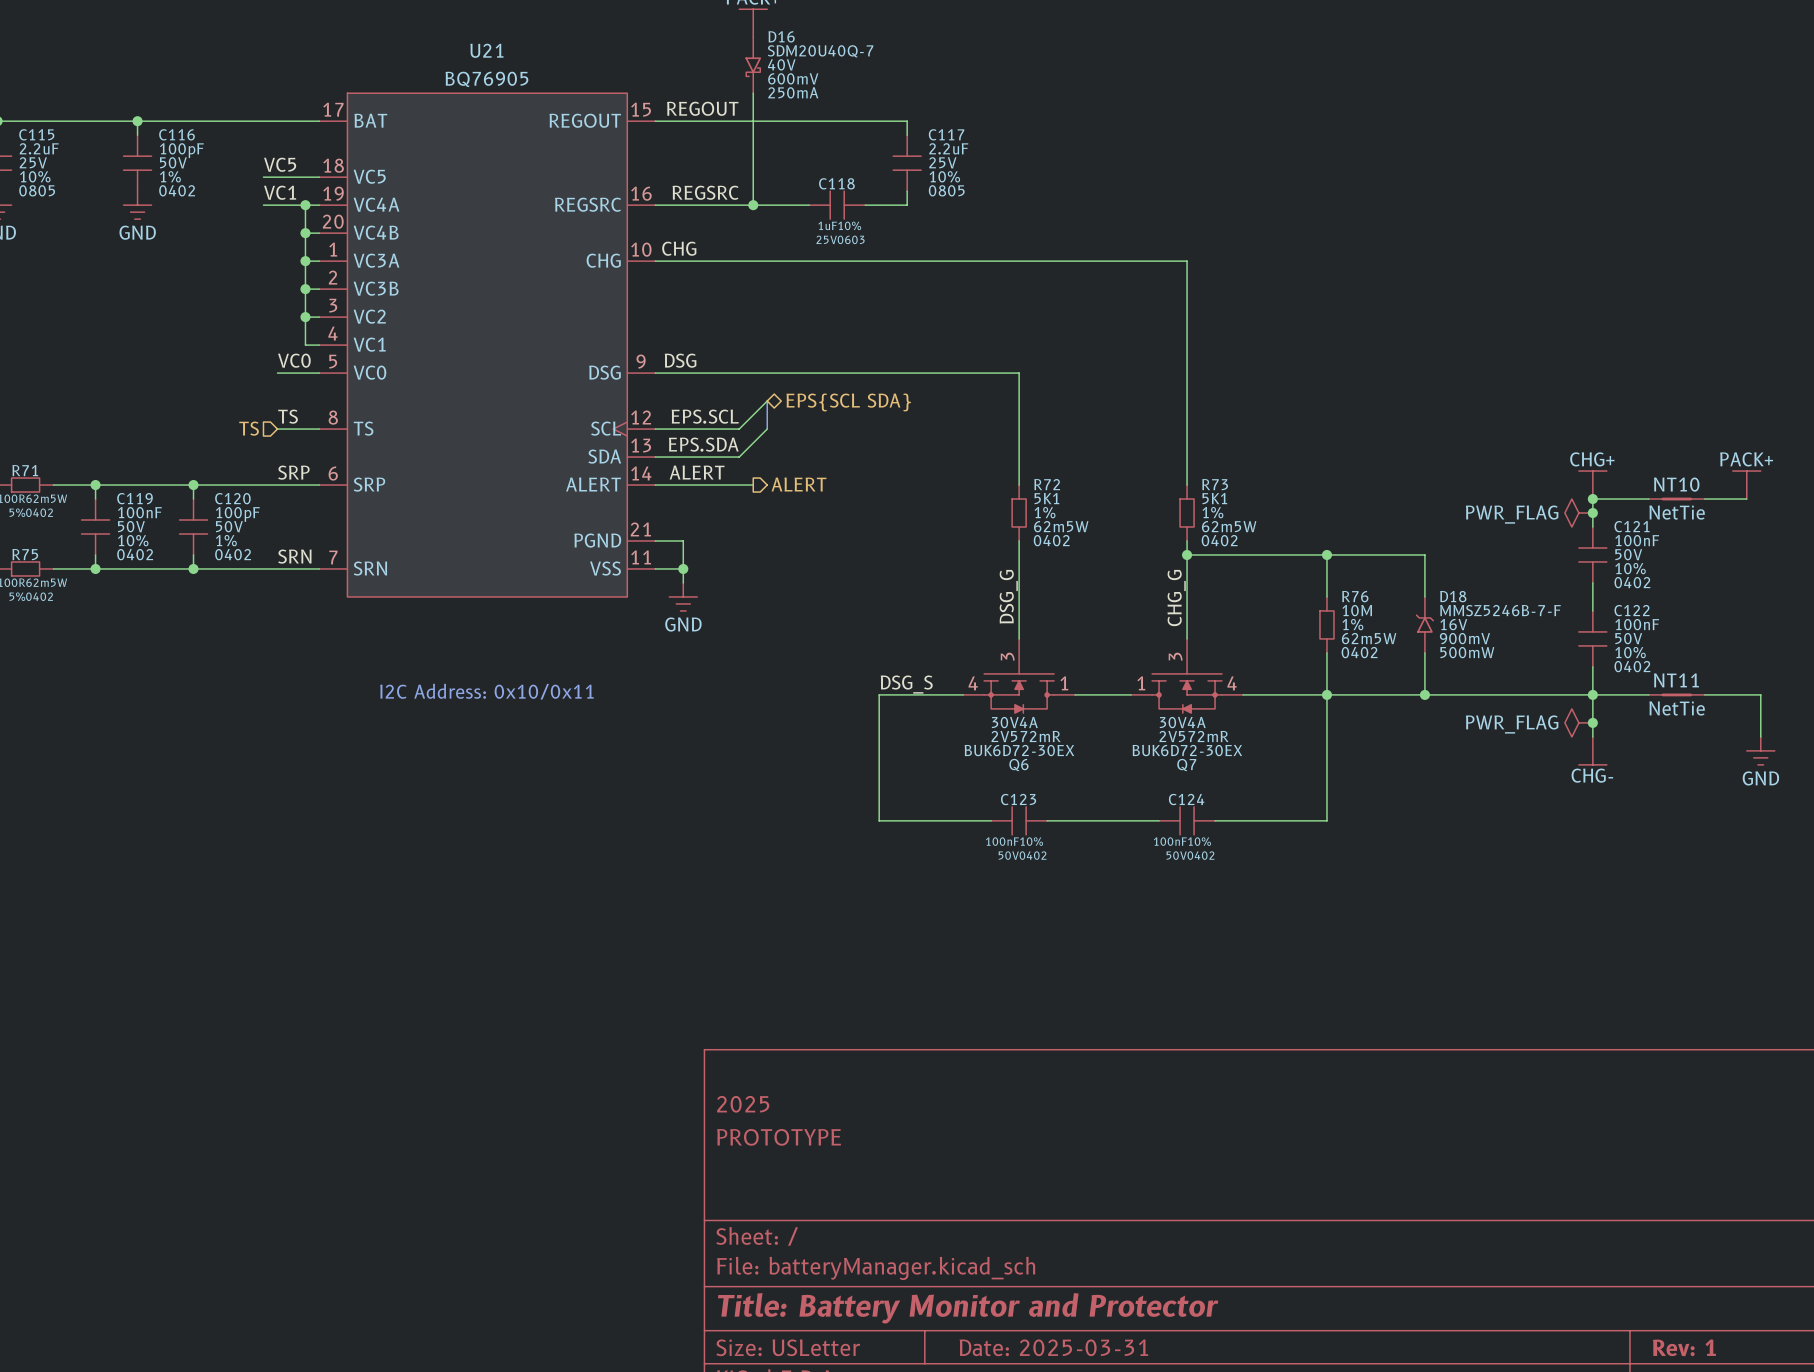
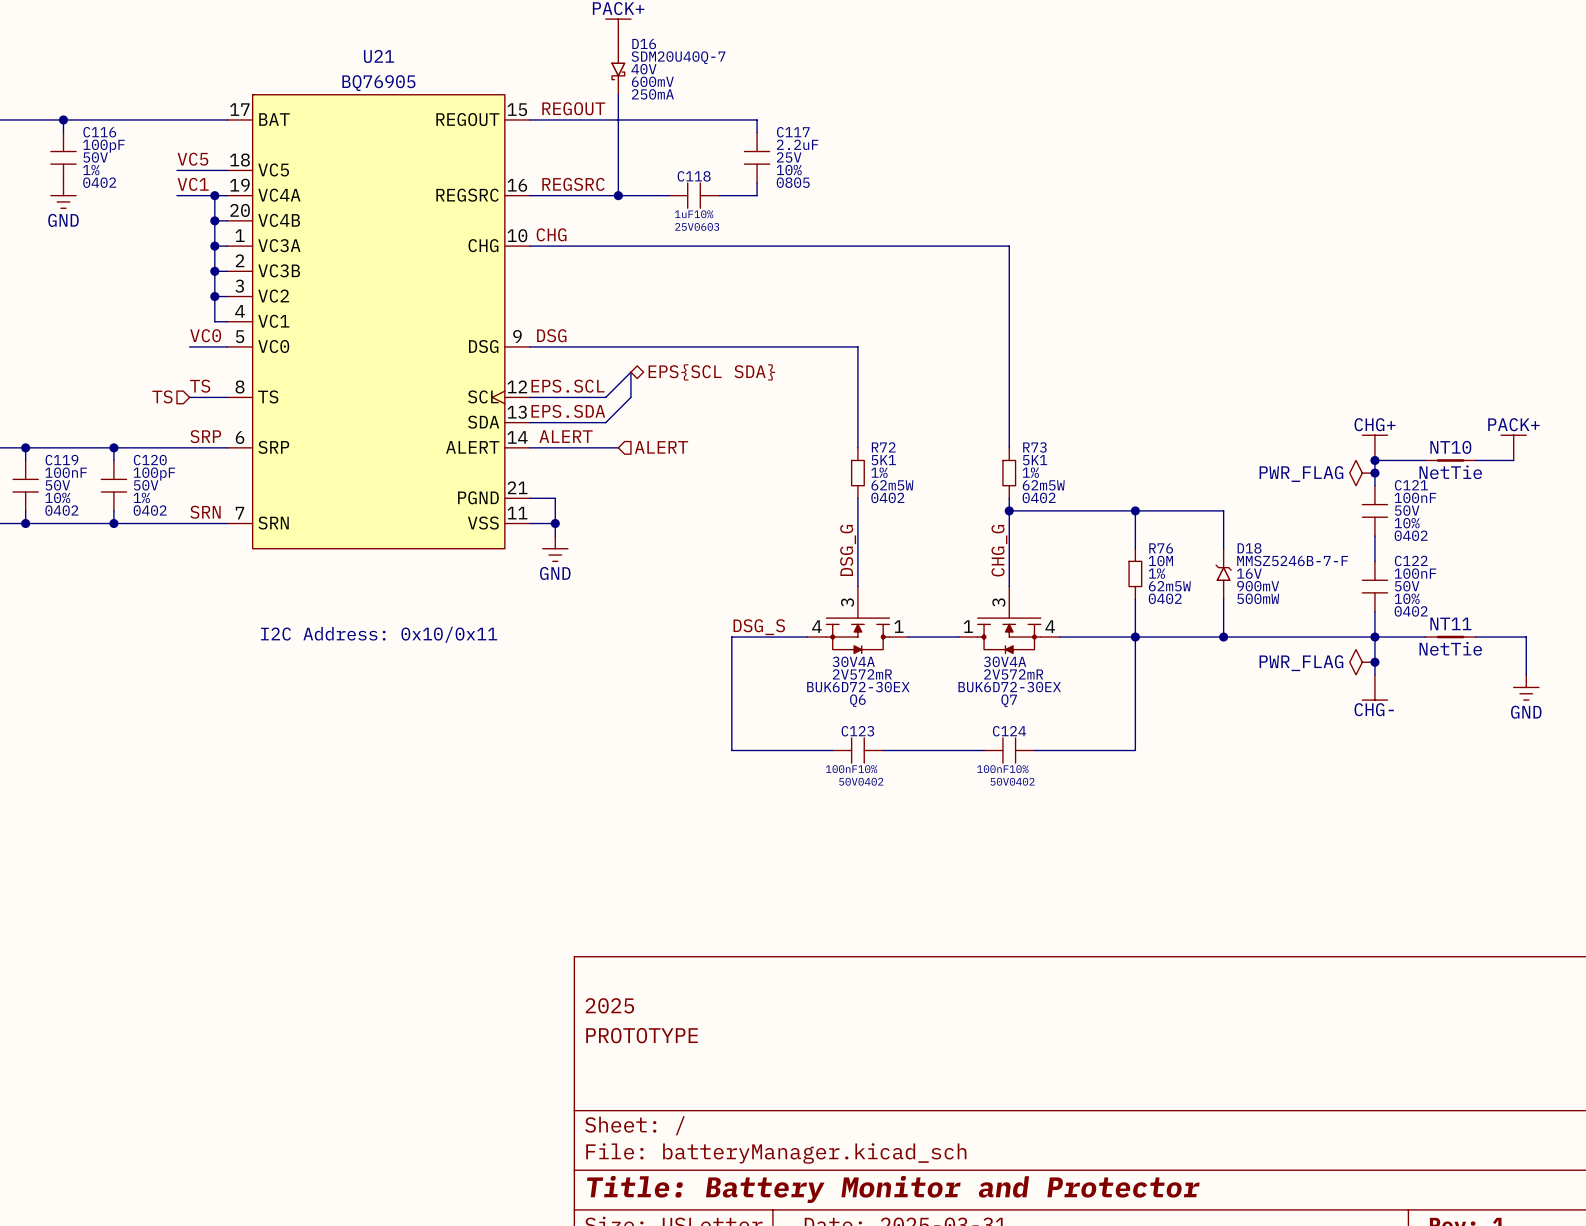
hierarchical label shape: output (798, 484) -> input (661, 447)

